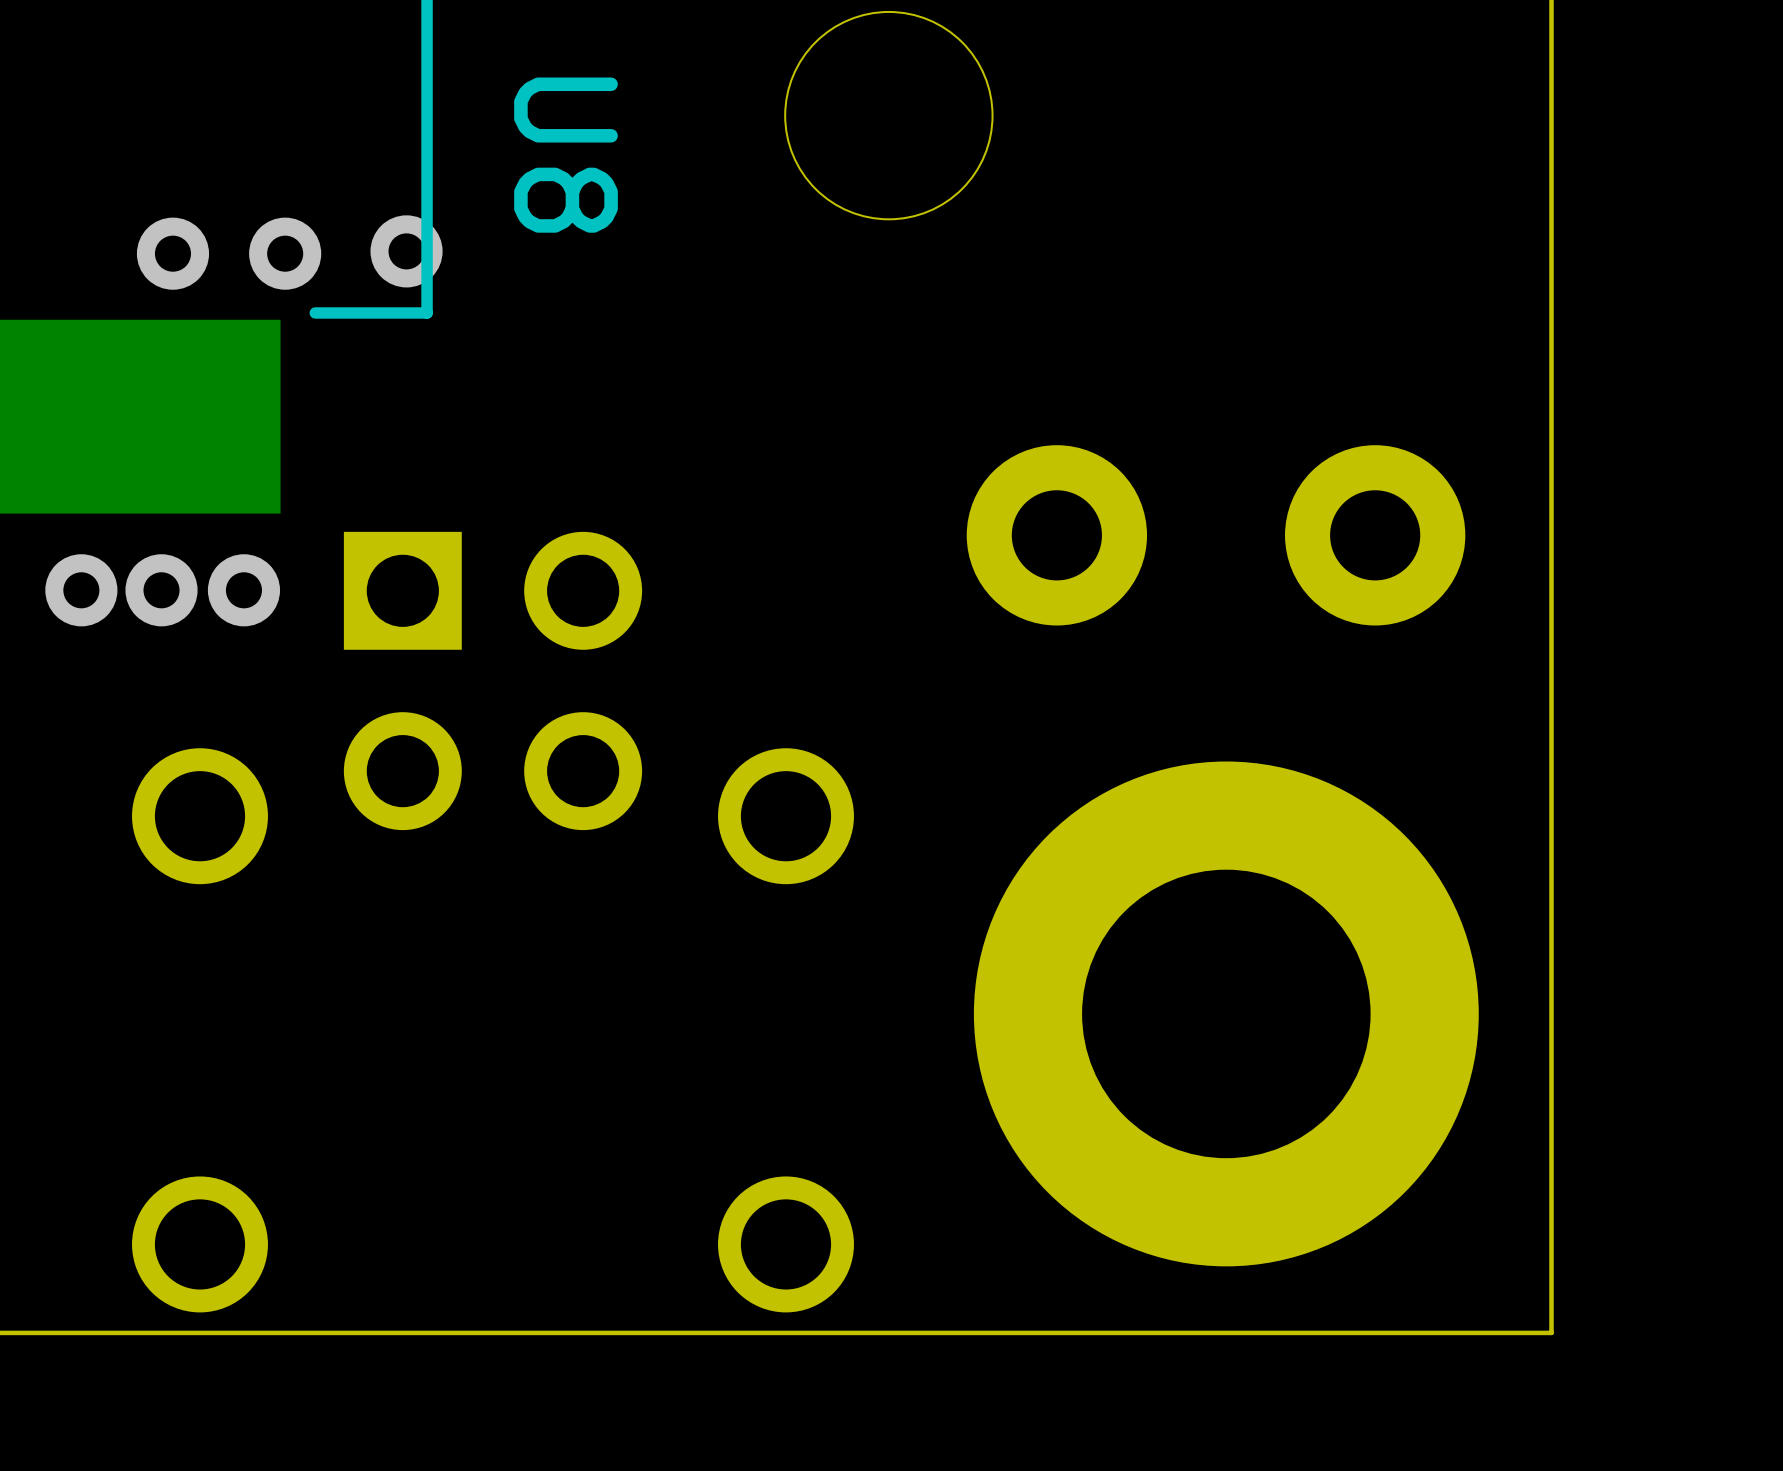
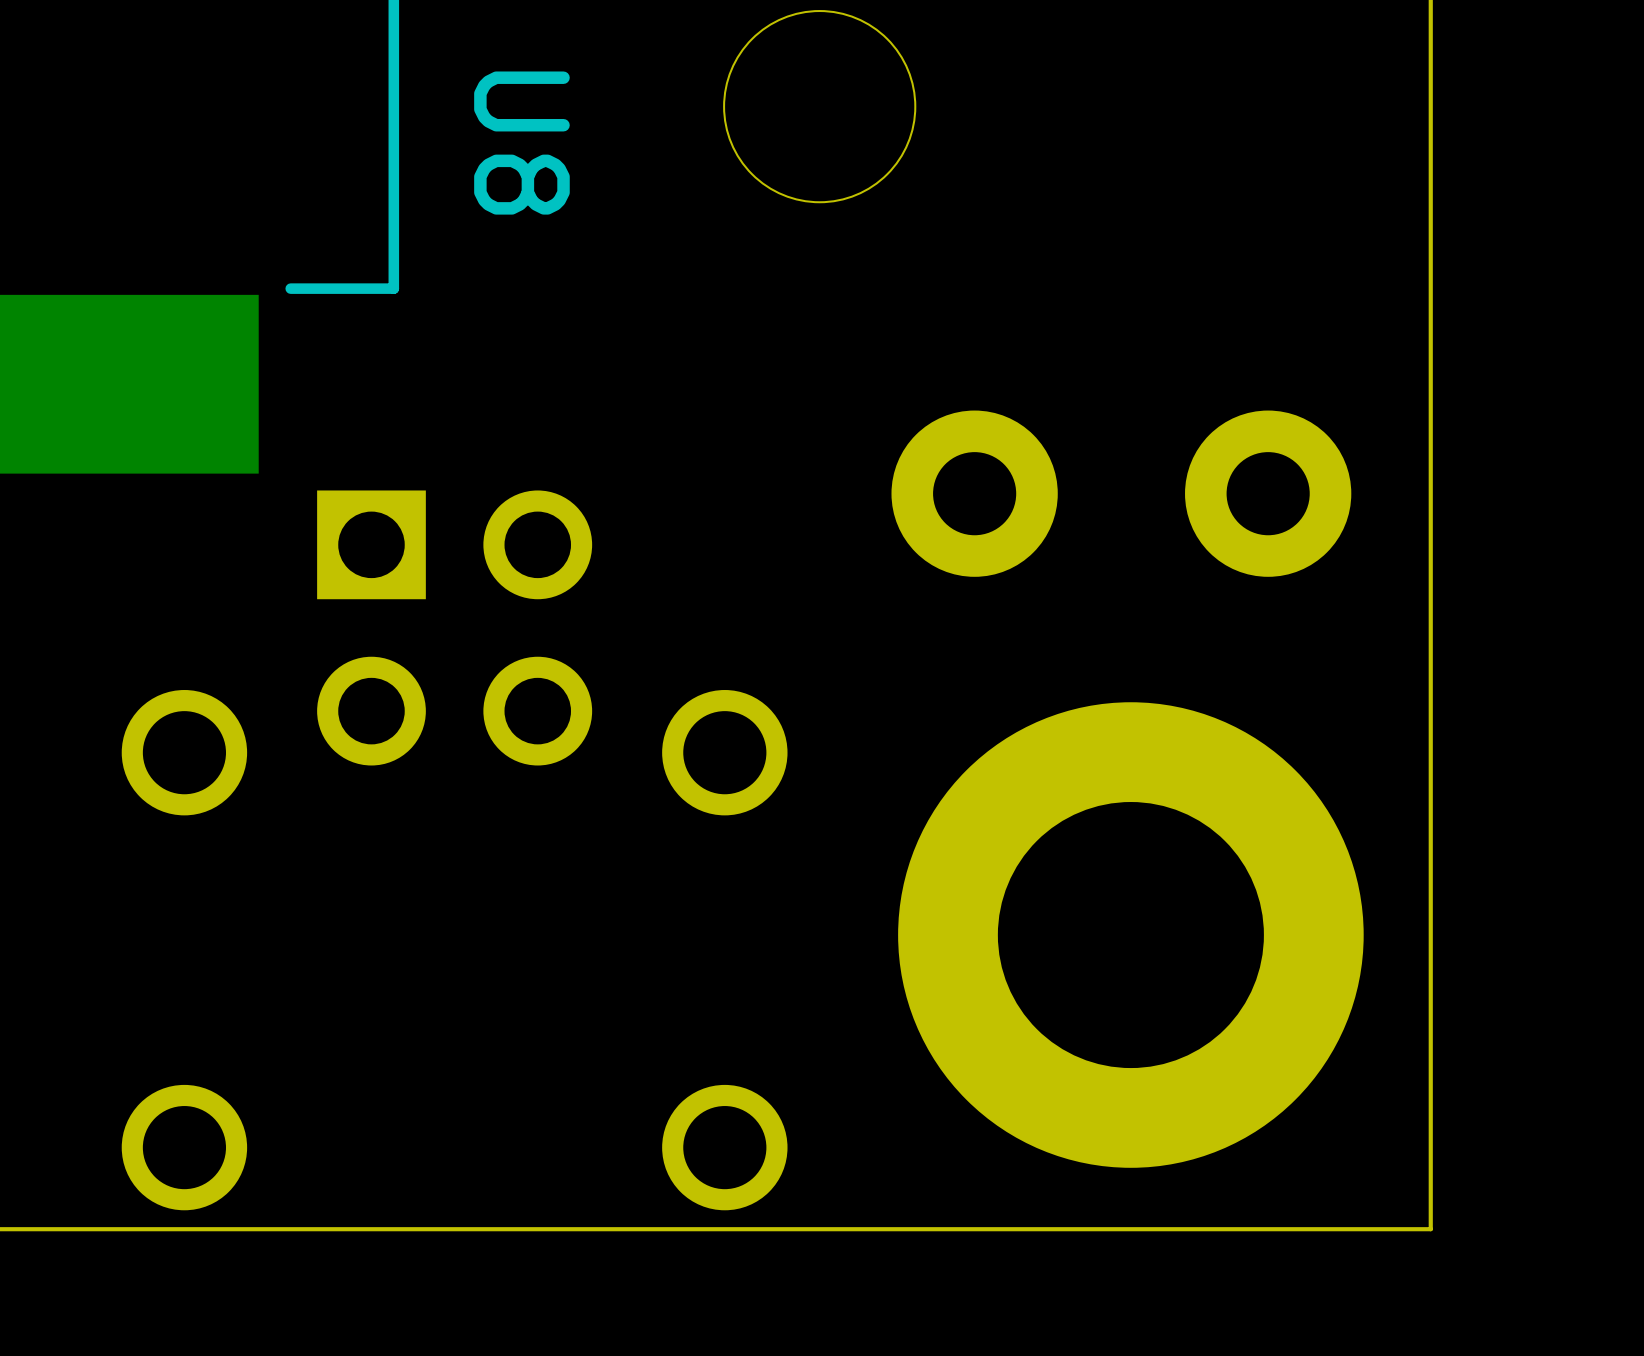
via: (406, 251) -> none
via: (172, 253) -> none
via: (285, 253) -> none
via: (81, 590) -> none
via: (161, 590) -> none
via: (243, 590) -> none

